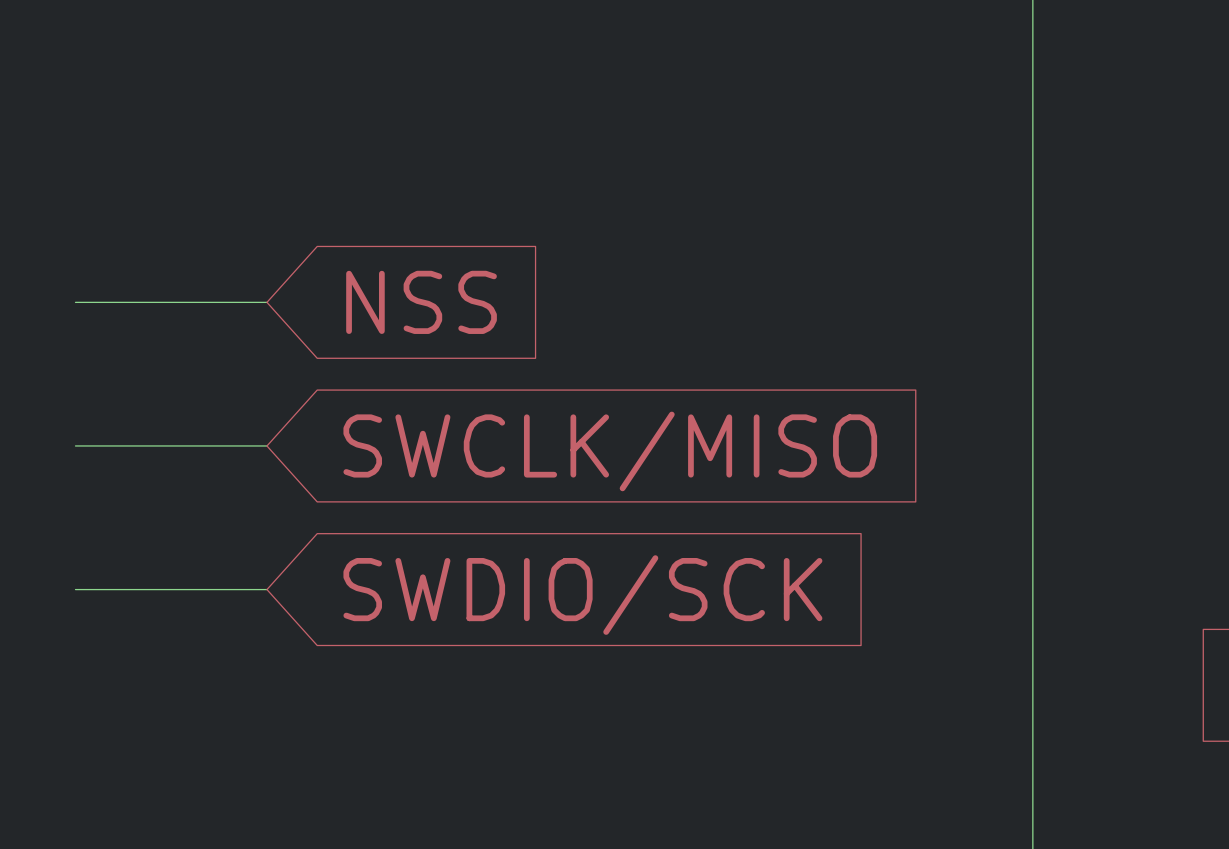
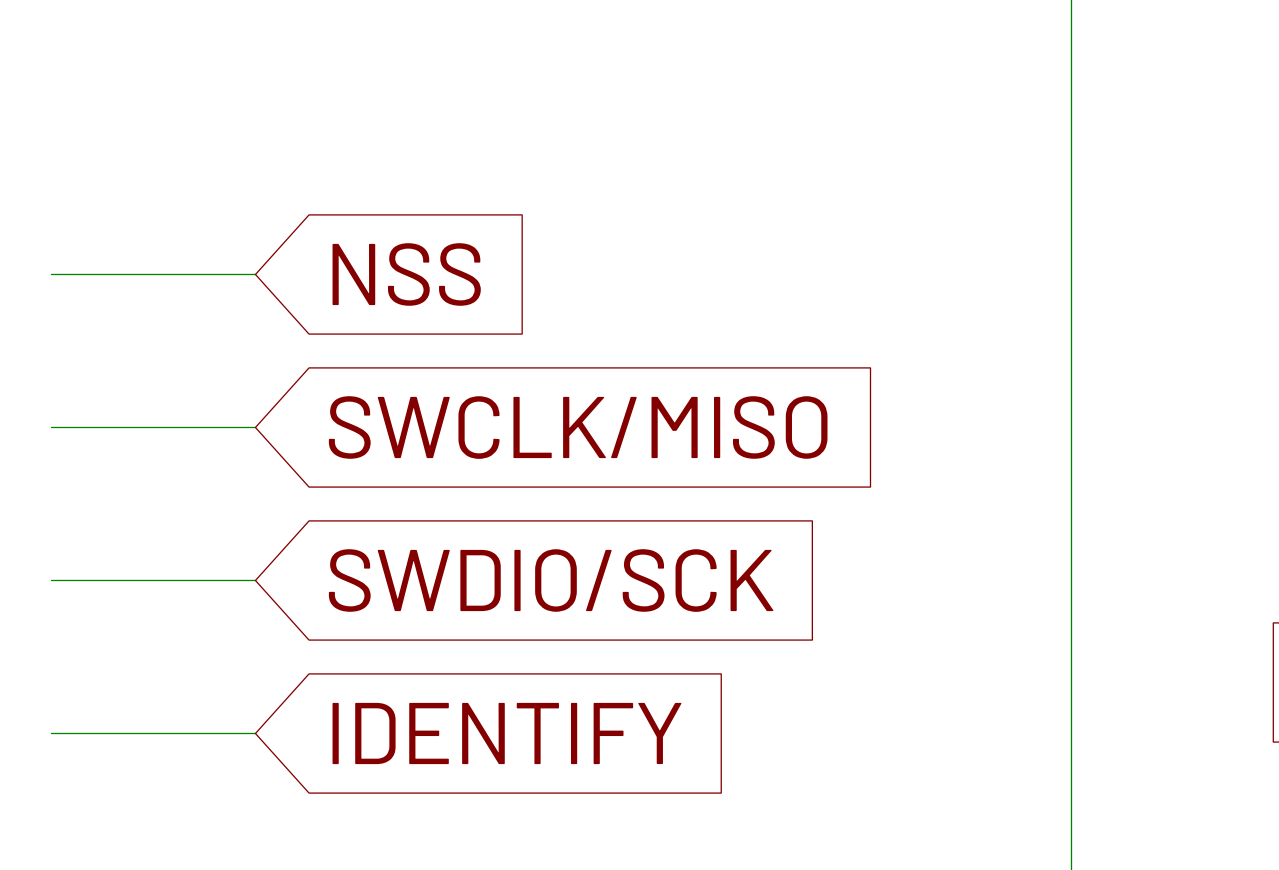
wire: none -> (51, 733) (255, 733)
global label: none -> IDENTIFY (507, 733)

